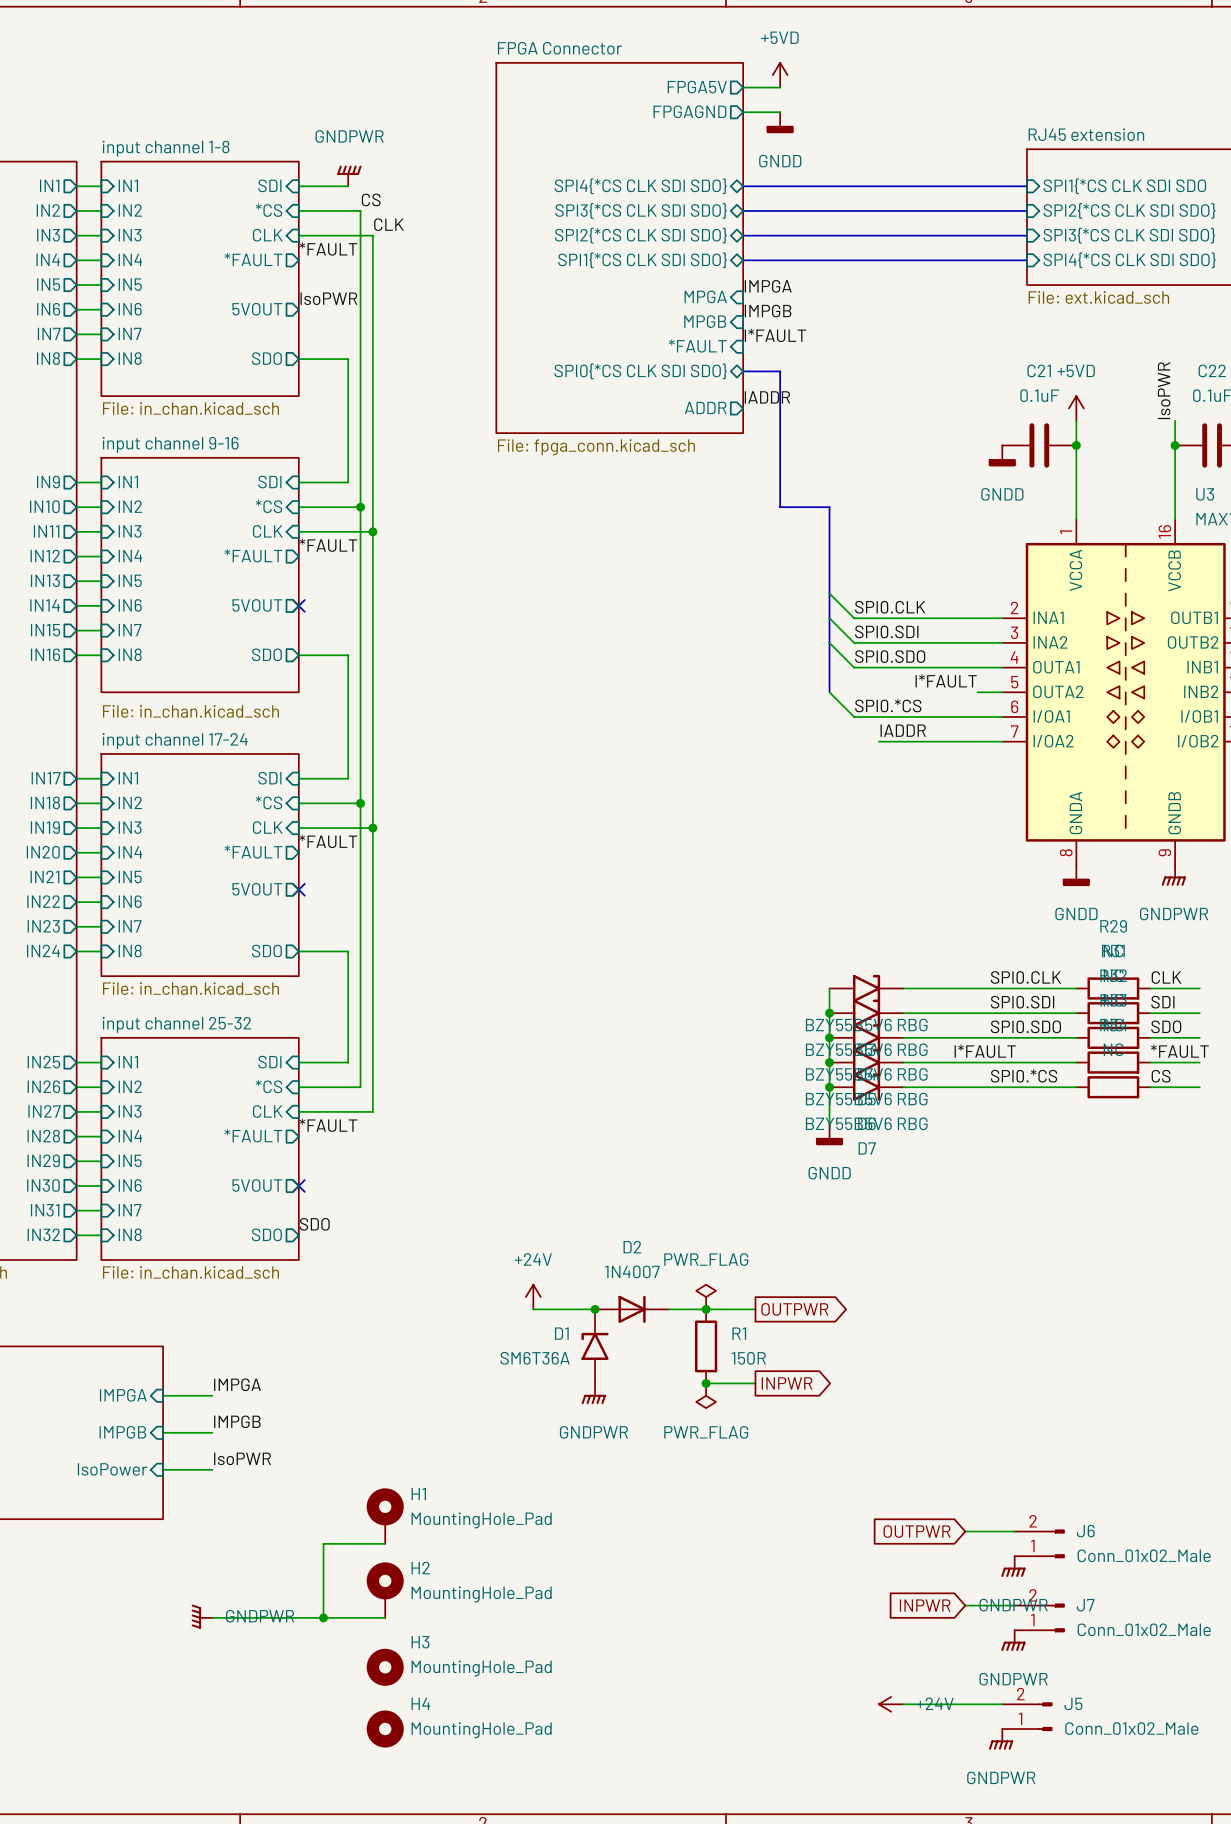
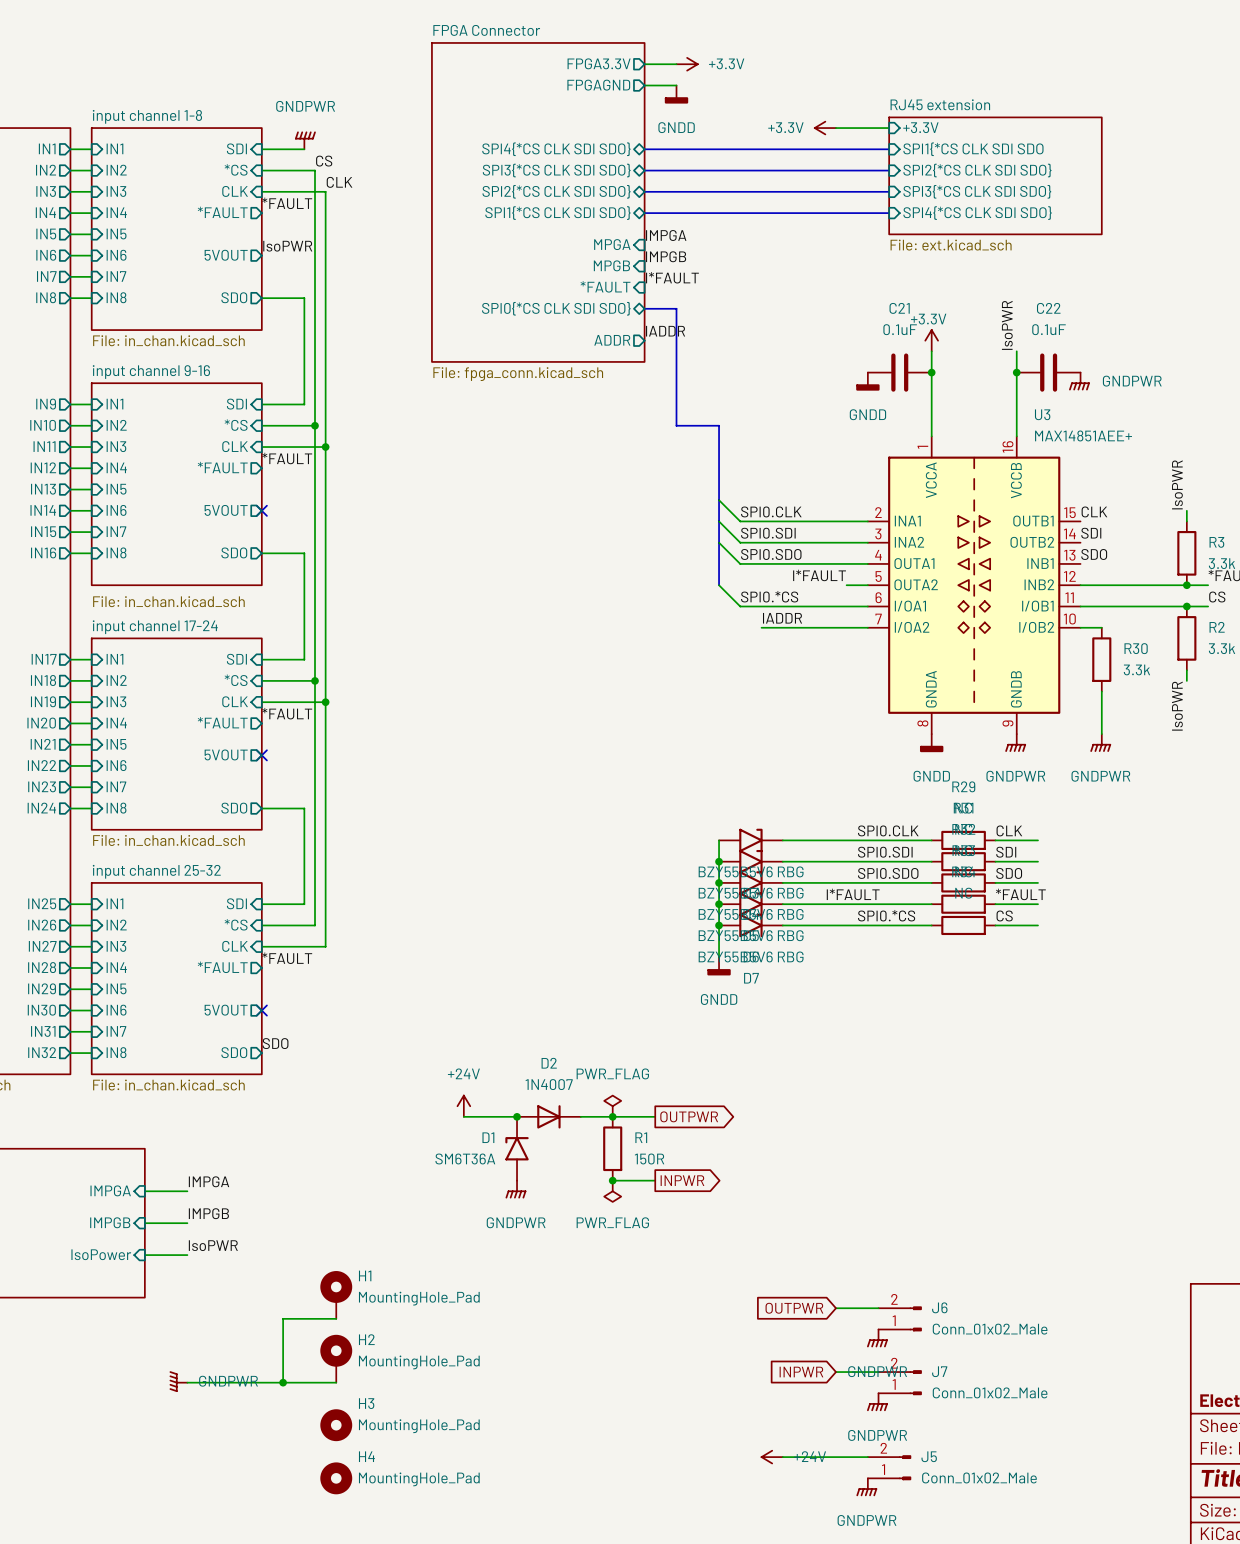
power symbol: +5VD (780, 75) -> none
sheet pin: FPGA5V (697, 87) -> FPGA3.3V (599, 63)
power symbol: none -> +3.3V (687, 64)
power symbol: none -> +3.3V (825, 128)
wire: none -> (835, 128) (889, 128)
sheet pin: none -> +3.3V (920, 127)
power symbol: +5VD (1076, 408) -> +3.3V (931, 340)

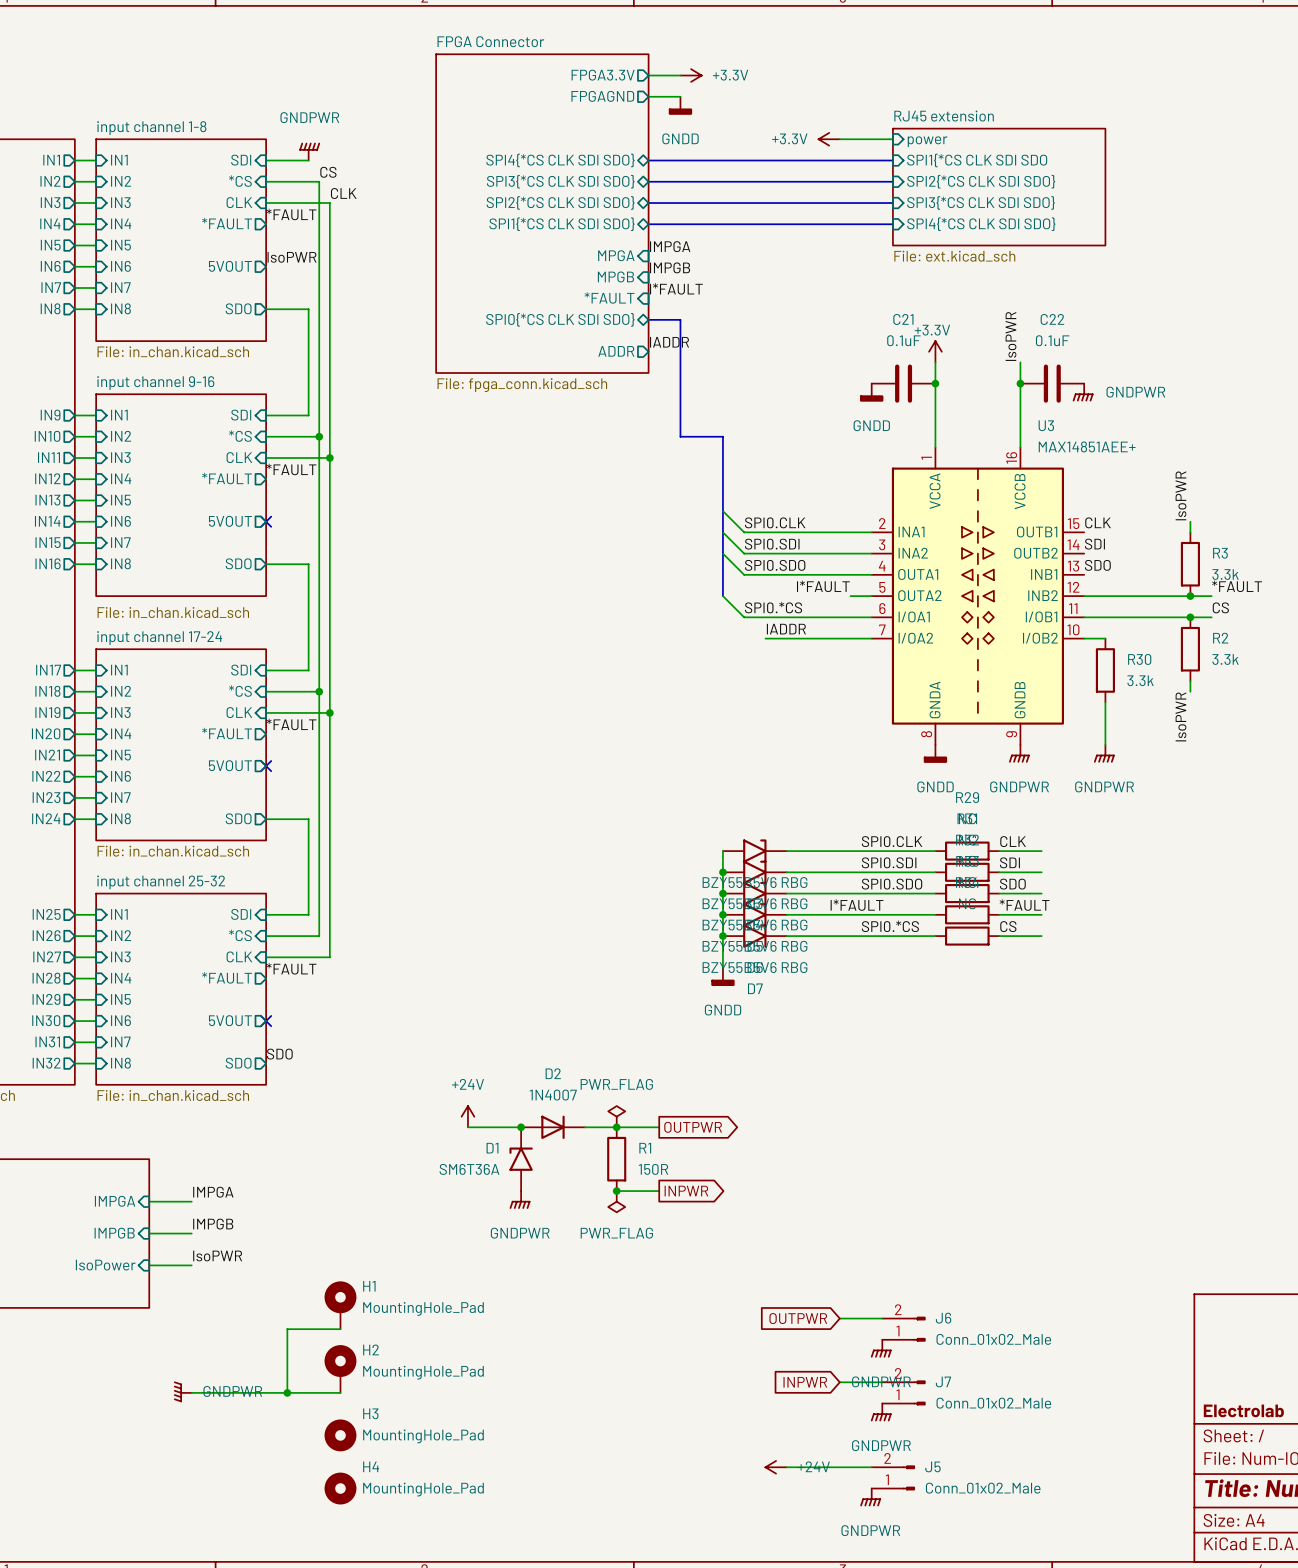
sheet pin: +3.3V (920, 127) -> power (927, 141)

